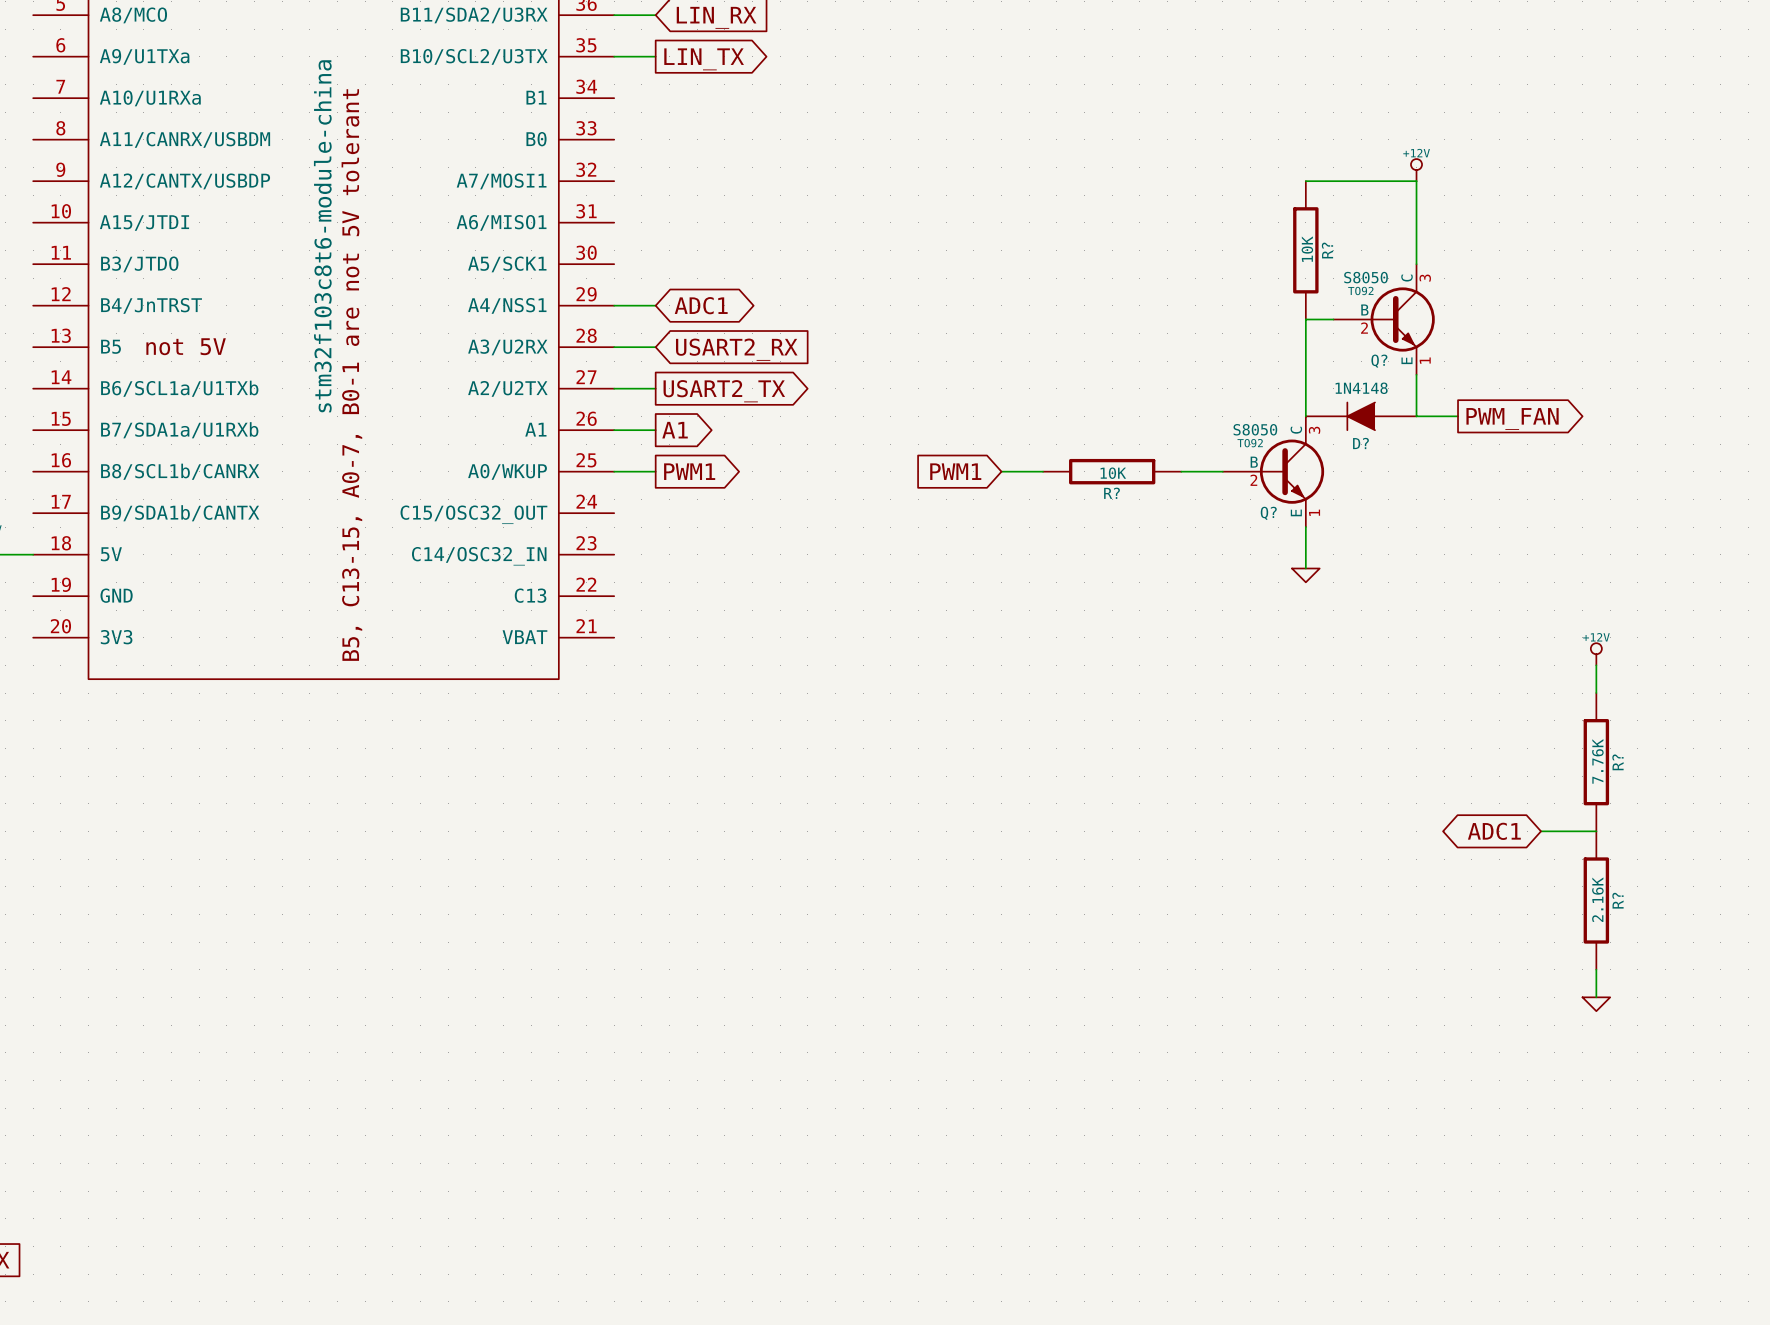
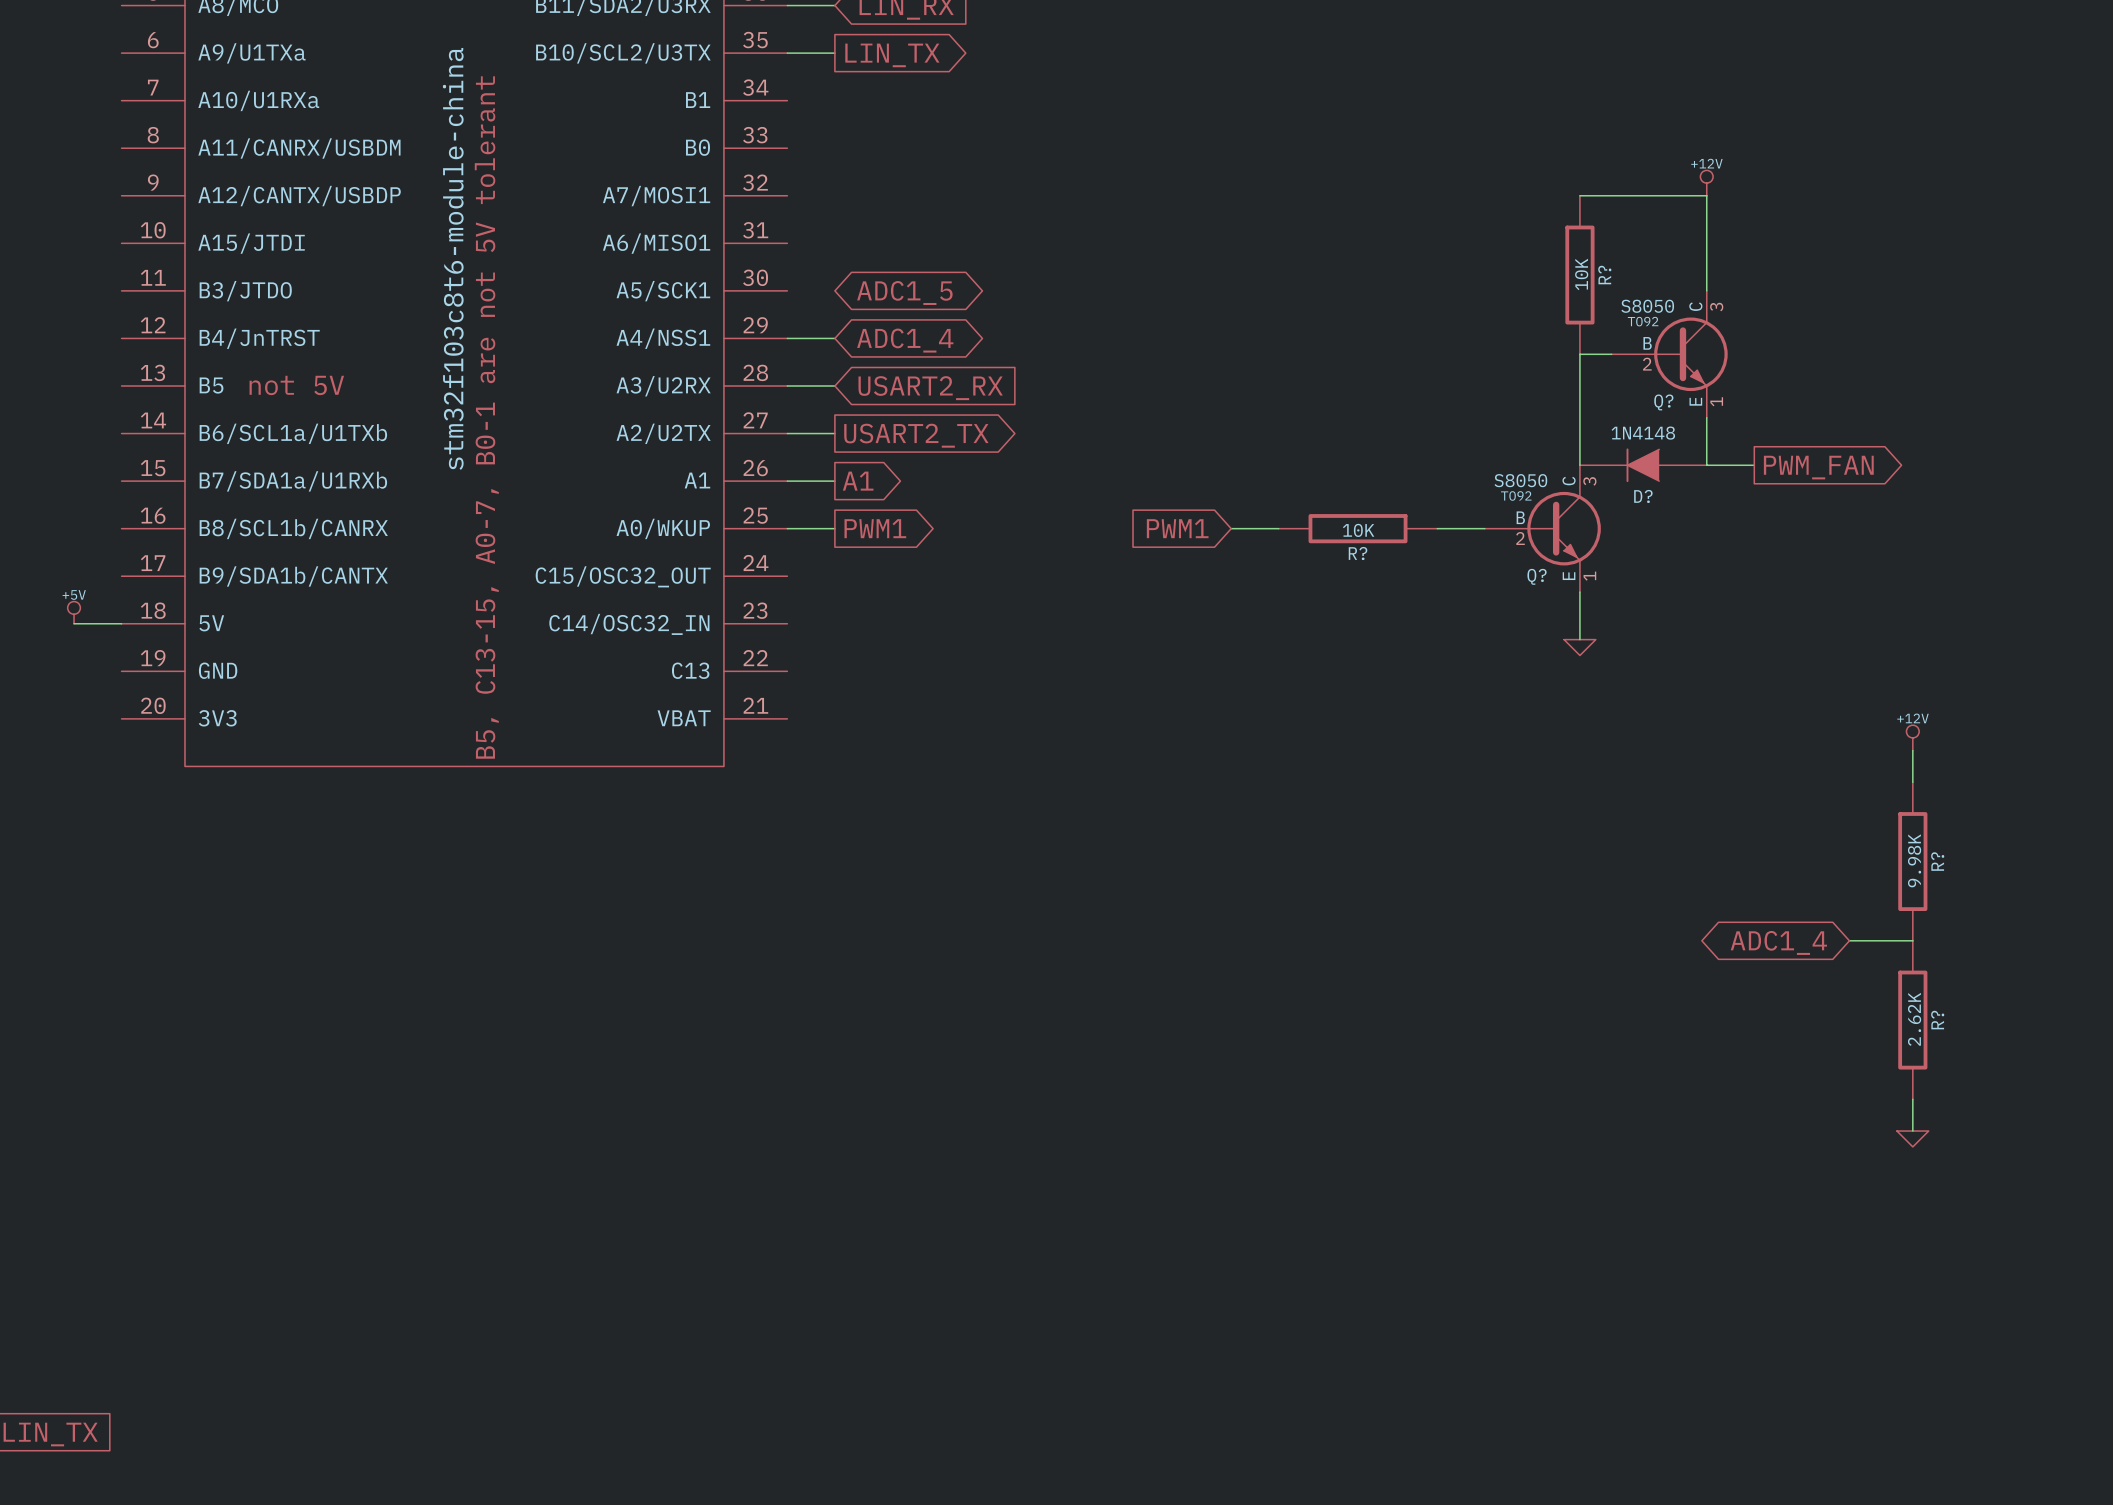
global label: none -> ADC1_5 (904, 293)
global label: ADC1 (701, 305) -> ADC1_4 (905, 340)
R? value: 7.76K (1597, 761) -> 9.98K (1914, 860)
global label: ADC1 (1494, 831) -> ADC1_4 (1778, 942)
R? value: 2.16K (1597, 899) -> 2.62K (1914, 1019)

